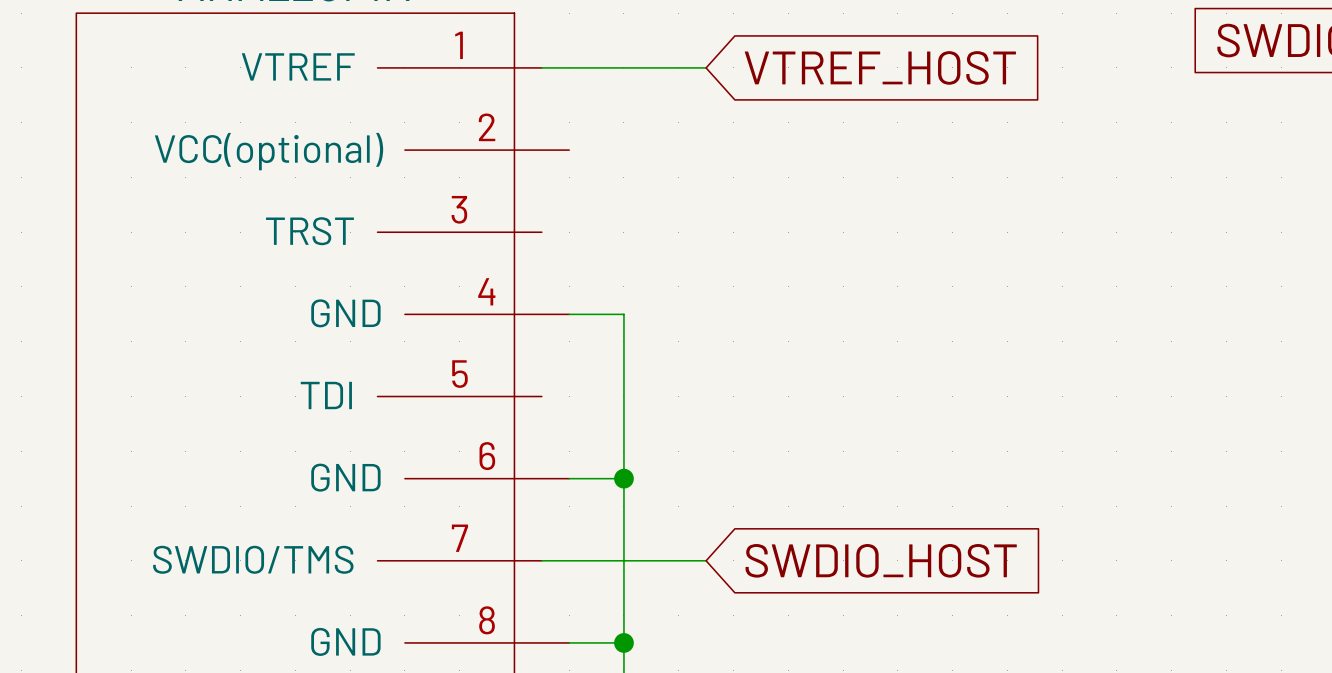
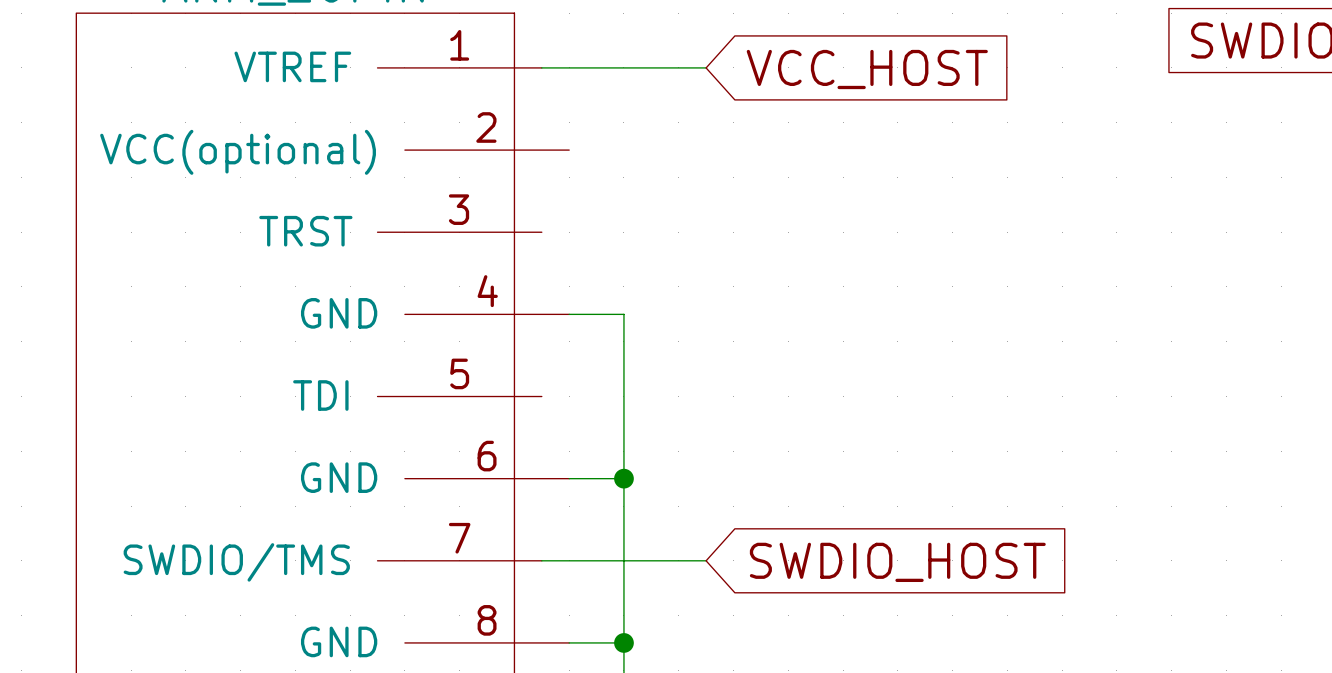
global label: VTREF_HOST (880, 67) -> VCC_HOST (867, 69)

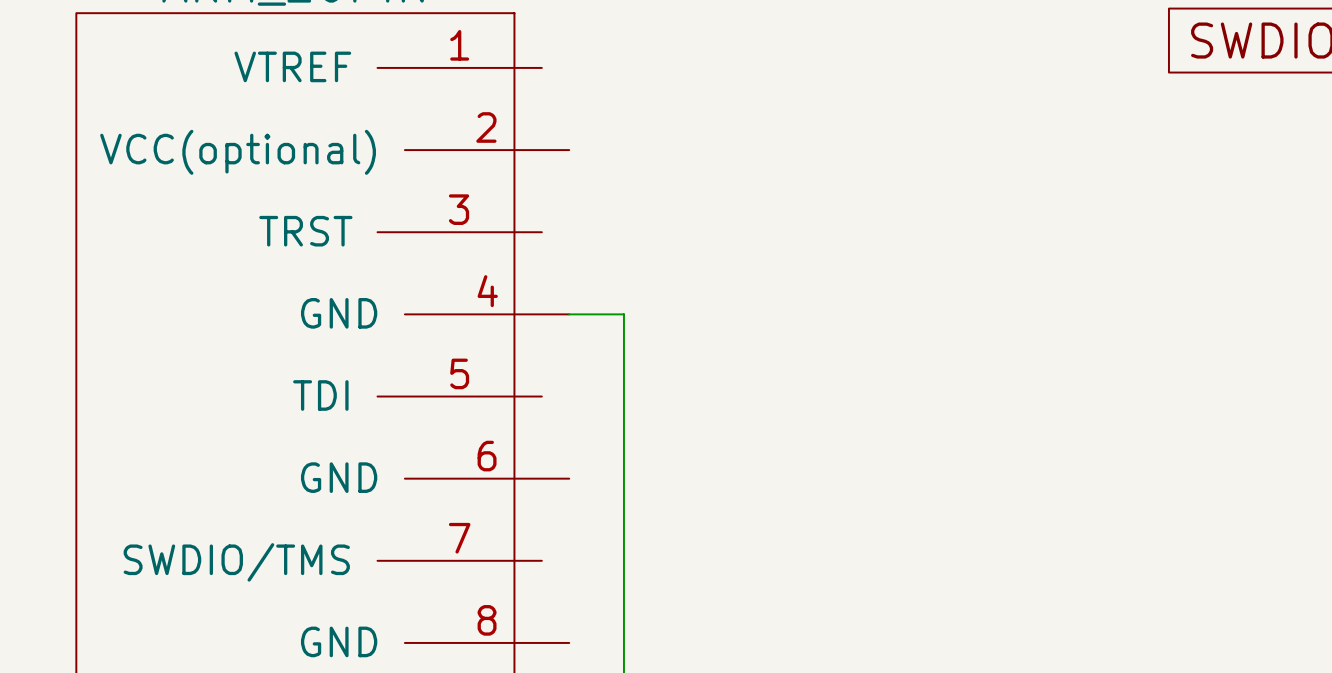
wire: (541, 67) (706, 67) -> none
global label: VCC_HOST (867, 69) -> none
wire: (569, 478) (623, 478) -> none
junction: (623, 478) -> none
wire: (541, 560) (706, 560) -> none
global label: SWDIO_HOST (897, 562) -> none
wire: (569, 642) (623, 642) -> none
junction: (623, 642) -> none

